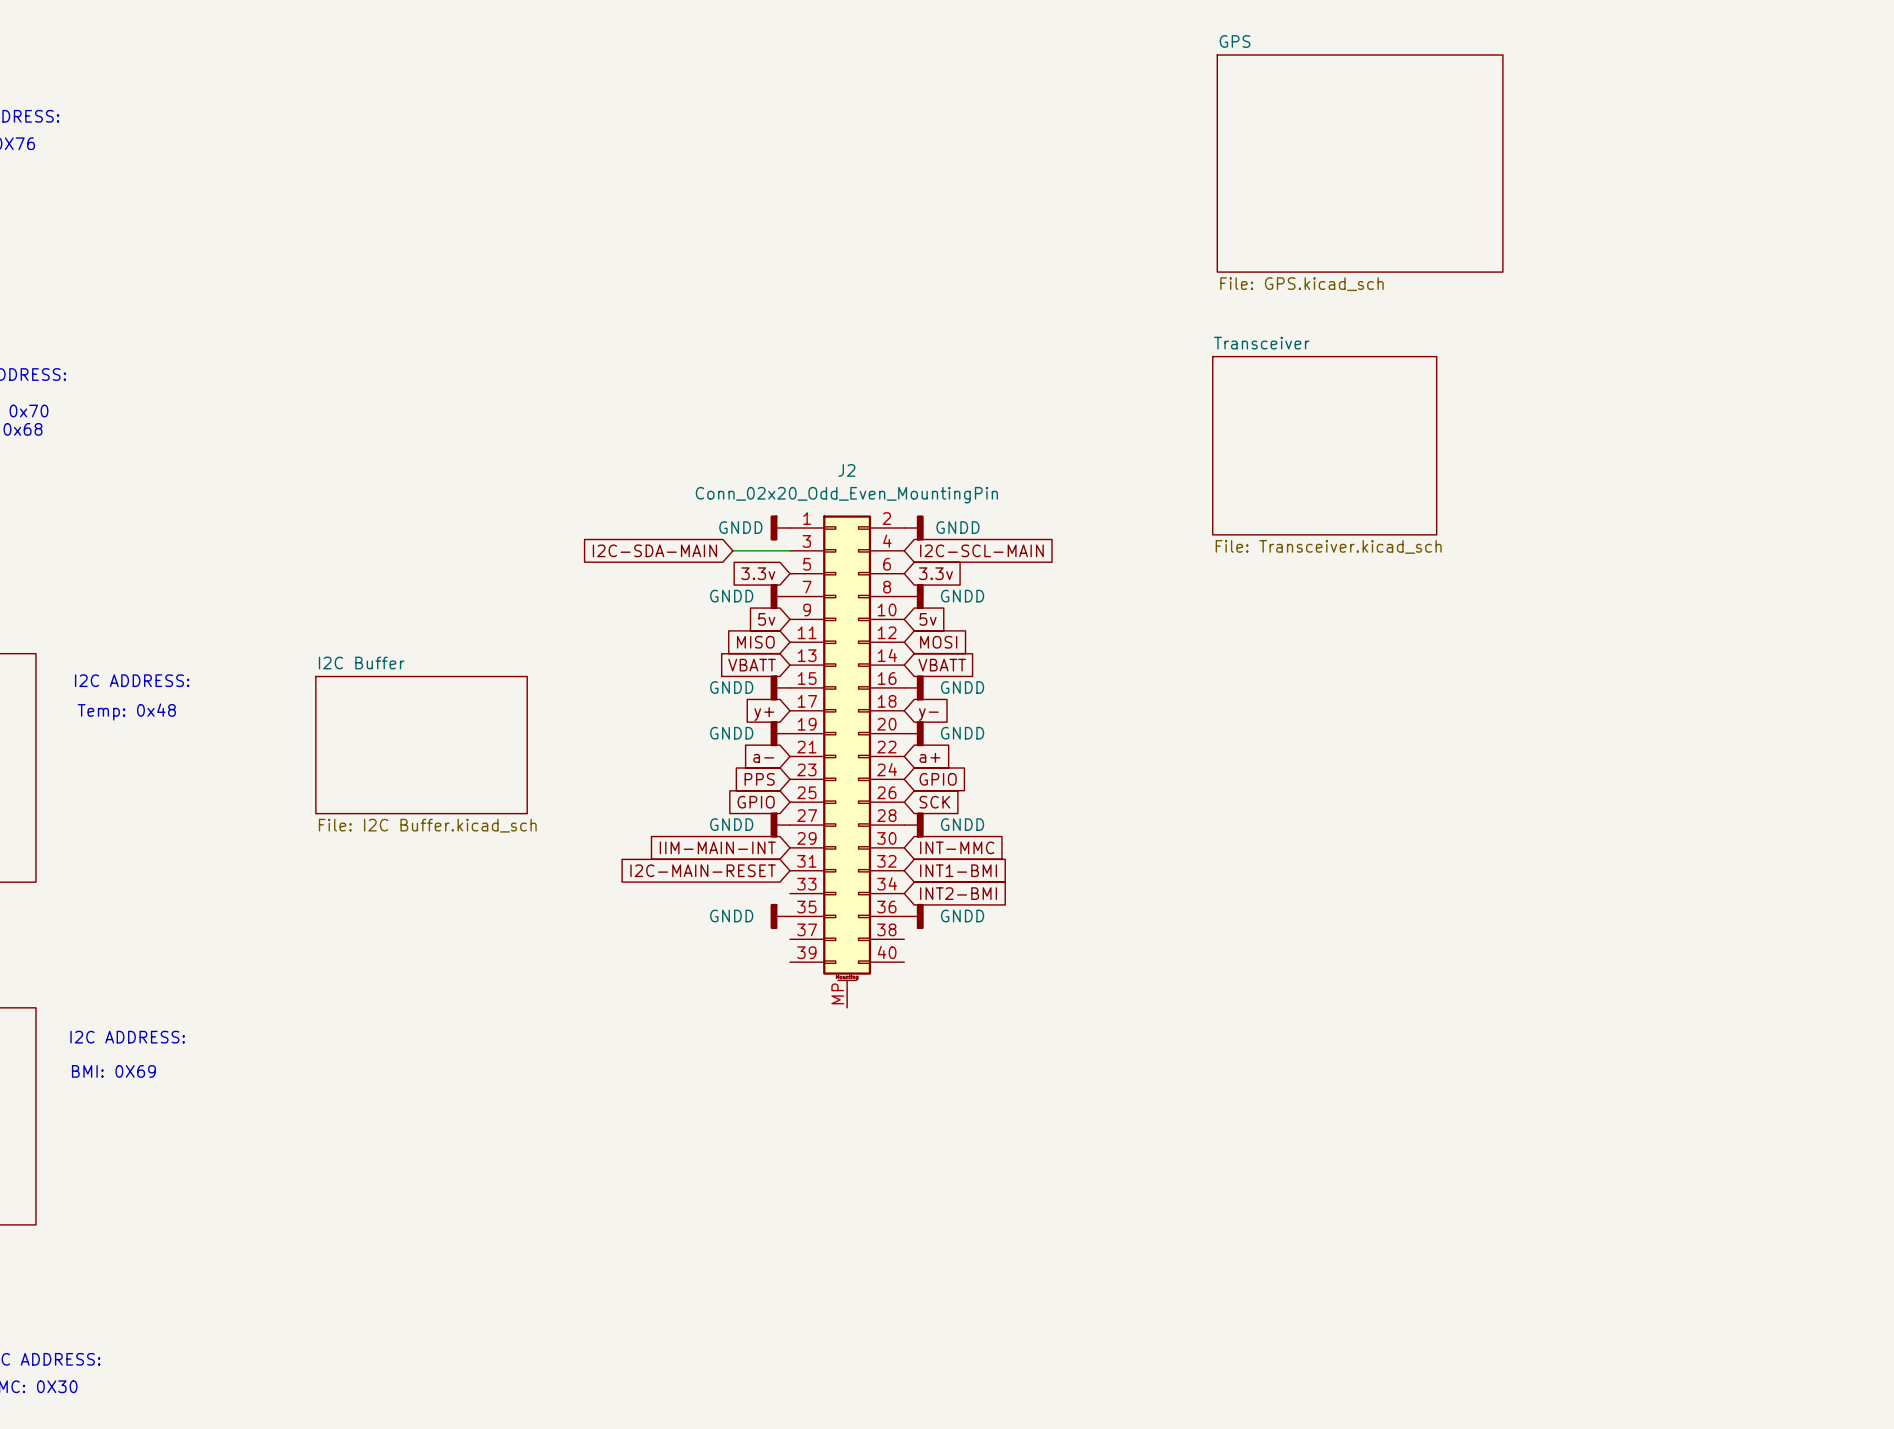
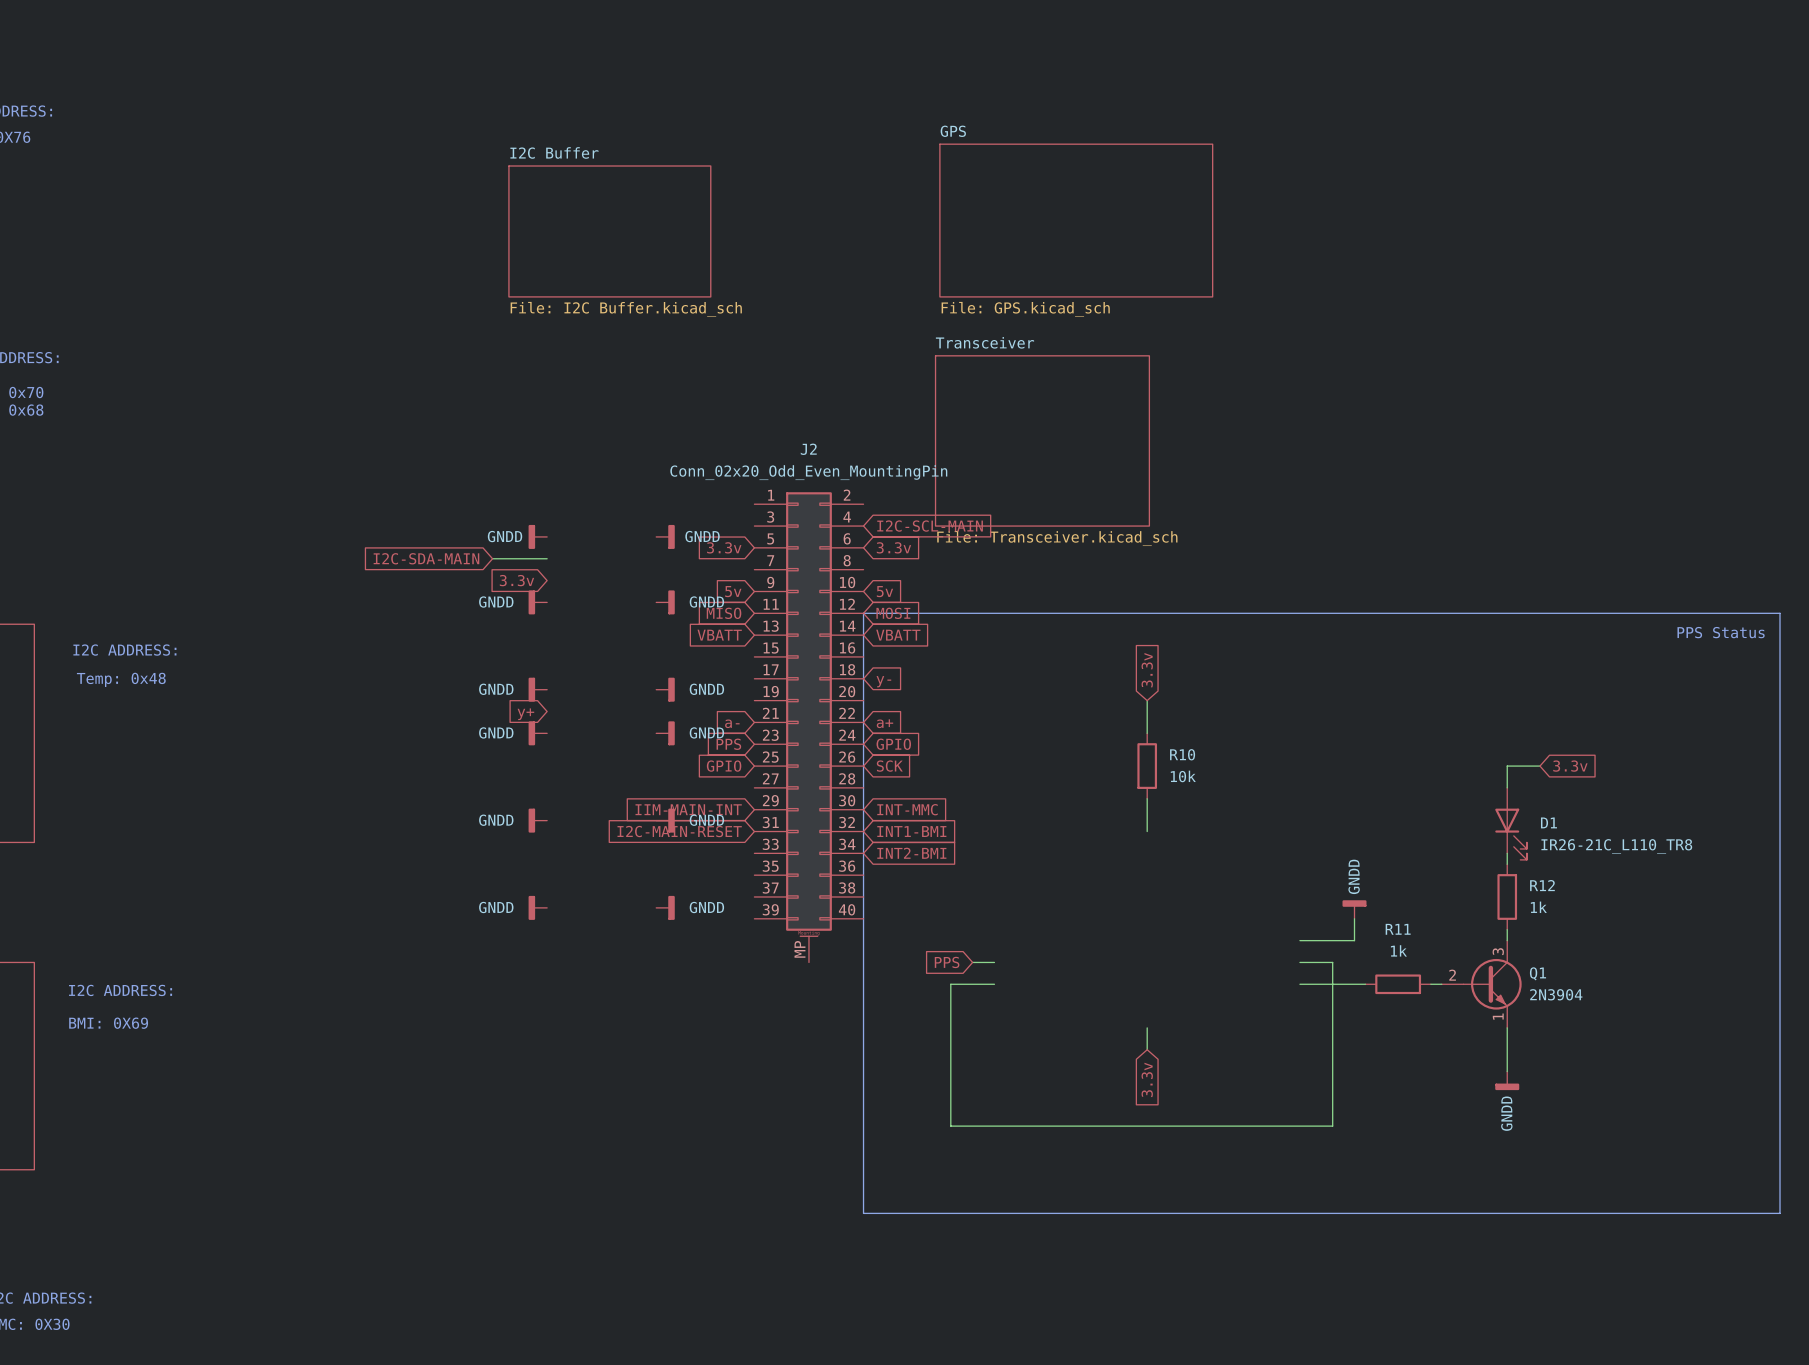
sheet GPS: File: GPS.kicad_sch (1360, 163) -> none
sheet GPS: none -> File: GPS.kicad_sch (1076, 220)
sheet Transceiver: File: Transceiver.kicad_sch (1324, 445) -> none
sheet Transceiver: none -> File: Transceiver.kicad_sch (1042, 440)
power symbol: GNDD (780, 528) -> none
power symbol: GNDD (913, 528) -> none
global label position: I2C-SDA-MAIN (654, 550) -> I2C-SDA-MAIN (426, 558)
wire: (732, 550) (790, 550) -> (492, 558) (547, 558)
power symbol: none -> GNDD (537, 536)
power symbol: none -> GNDD (665, 536)
power symbol: GNDD (780, 596) -> none
power symbol: GNDD (913, 596) -> none
global label: none -> 3.3v (516, 580)
power symbol: none -> GNDD (537, 602)
power symbol: none -> GNDD (665, 602)
line: none -> (863, 613) (1780, 613) (1780, 1213) (863, 1213) (863, 613)
text: none -> PPS Status (1721, 632)
power symbol: GNDD (780, 687) -> none
power symbol: GNDD (913, 687) -> none
global label: none -> 3.3v (1147, 670)
global label position: y+ (764, 714) -> y+ (525, 714)
power symbol: none -> GNDD (537, 689)
power symbol: none -> GNDD (665, 689)
power symbol: GNDD (780, 733) -> none
power symbol: GNDD (913, 733) -> none
wire: none -> (1147, 700) (1147, 733)
sheet I2C Buffer position: (421, 745) -> (609, 231)
power symbol: none -> GNDD (537, 733)
power symbol: none -> GNDD (665, 733)
R10: none -> 10k (1147, 766)
wire: none -> (1539, 766) (1507, 766) (1507, 787)
global label: none -> 3.3v (1570, 766)
power symbol: GNDD (780, 825) -> none
power symbol: GNDD (913, 825) -> none
wire: none -> (1147, 798) (1147, 831)
power symbol: none -> GNDD (537, 820)
power symbol: none -> GNDD (665, 820)
D1: none -> IR26-21C_L110_TR8 (1511, 823)
wire: none -> (1507, 853) (1507, 864)
power symbol: GNDD (780, 916) -> none
power symbol: GNDD (913, 916) -> none
R12: none -> 1k (1507, 896)
power symbol: none -> GNDD (537, 907)
power symbol: none -> GNDD (665, 907)
power symbol: none -> GNDD (1354, 909)
wire: none -> (1354, 918) (1354, 940) (1299, 940)
wire: none -> (1507, 929) (1507, 940)
global label: none -> PPS (947, 962)
wire: none -> (972, 962) (994, 962)
wire: none -> (1299, 962) (1332, 962) (1332, 1126) (950, 1126) (950, 984) (994, 984)
wire: none -> (1299, 984) (1365, 984)
R11: none -> 1k (1398, 984)
wire: none -> (1430, 984) (1441, 984)
Q1: none -> 2N3904 (1481, 984)
wire: none -> (1147, 1027) (1147, 1049)
wire: none -> (1507, 1027) (1507, 1071)
global label: none -> 3.3v (1147, 1079)
power symbol: none -> GNDD (1507, 1080)

